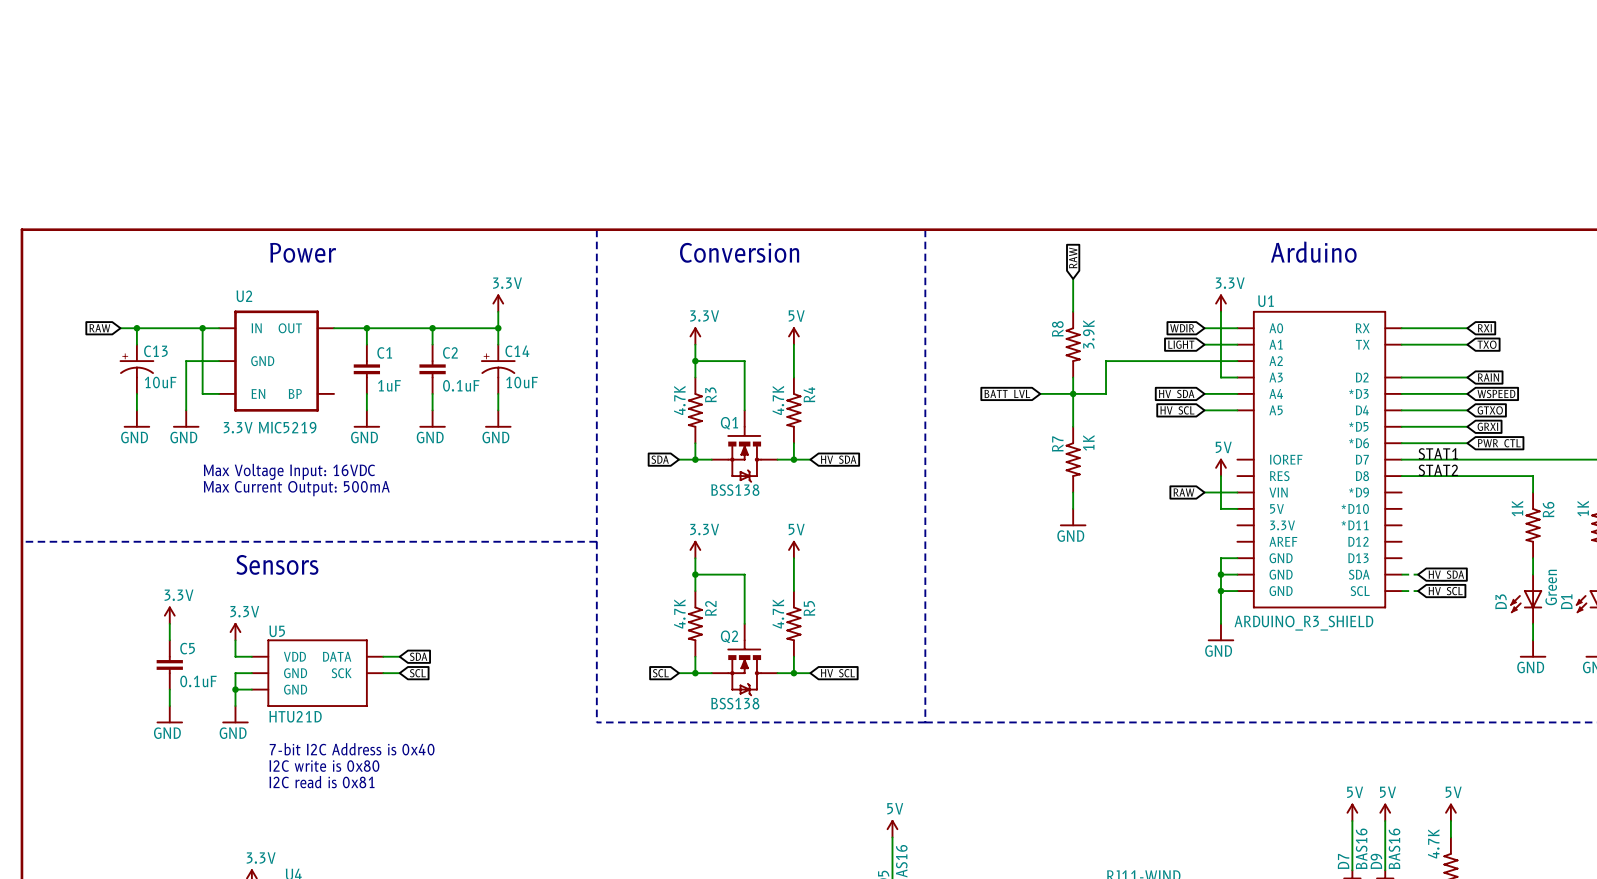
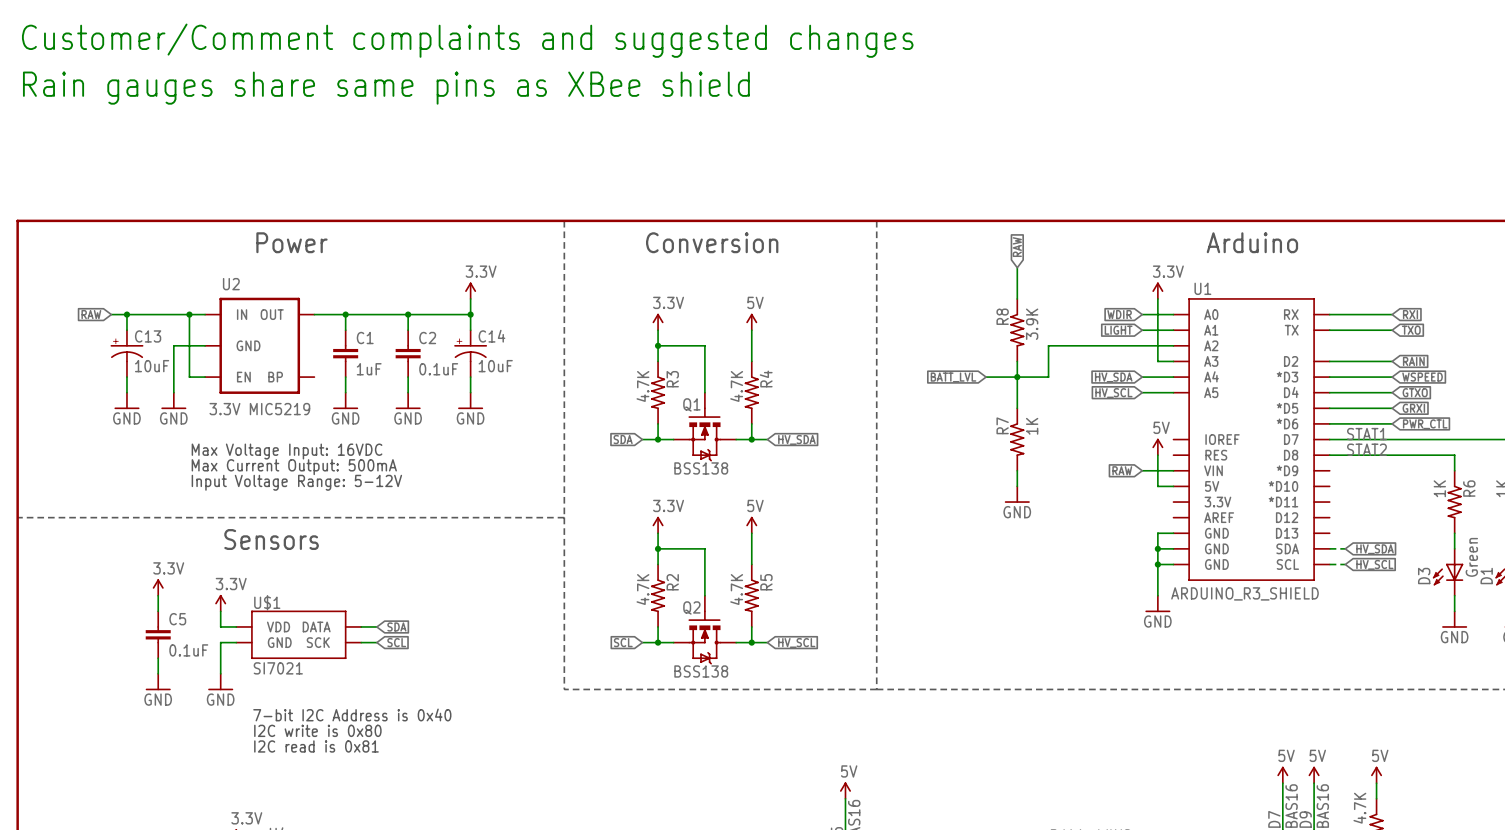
text: none -> Customer/Comment complaints and suggested changes (467, 40)
text: none -> Rain gauges share same pins as XBee shield (386, 88)
text: none -> Input Voltage Range: 5-12V (296, 482)
U$1: none -> SI7021 (298, 634)
U5: HTU21D (317, 673) -> none
wire: (235, 689) (251, 689) -> none
junction: (235, 689) -> none

